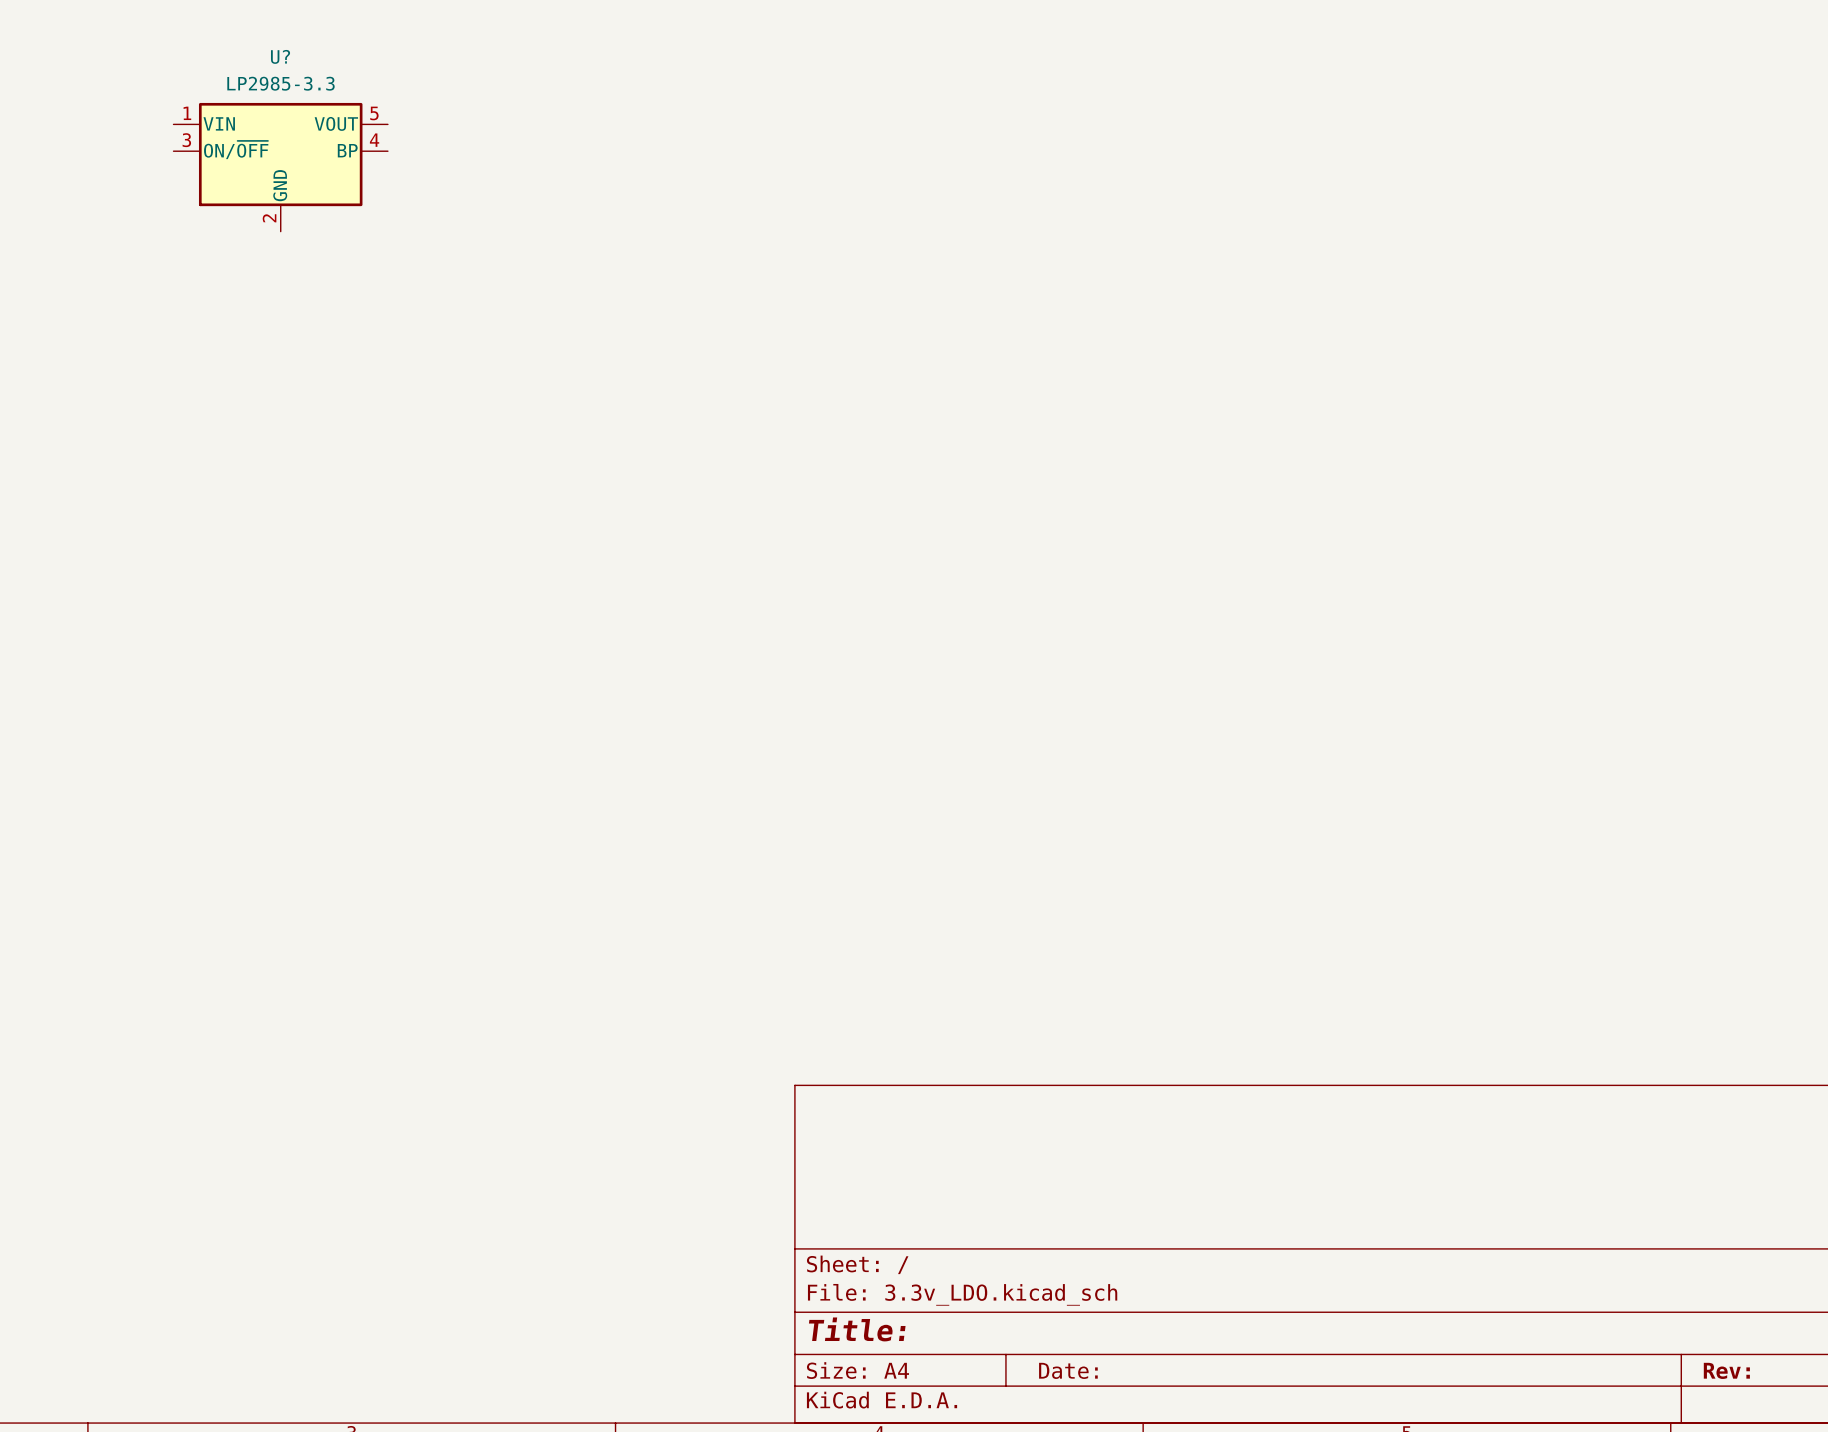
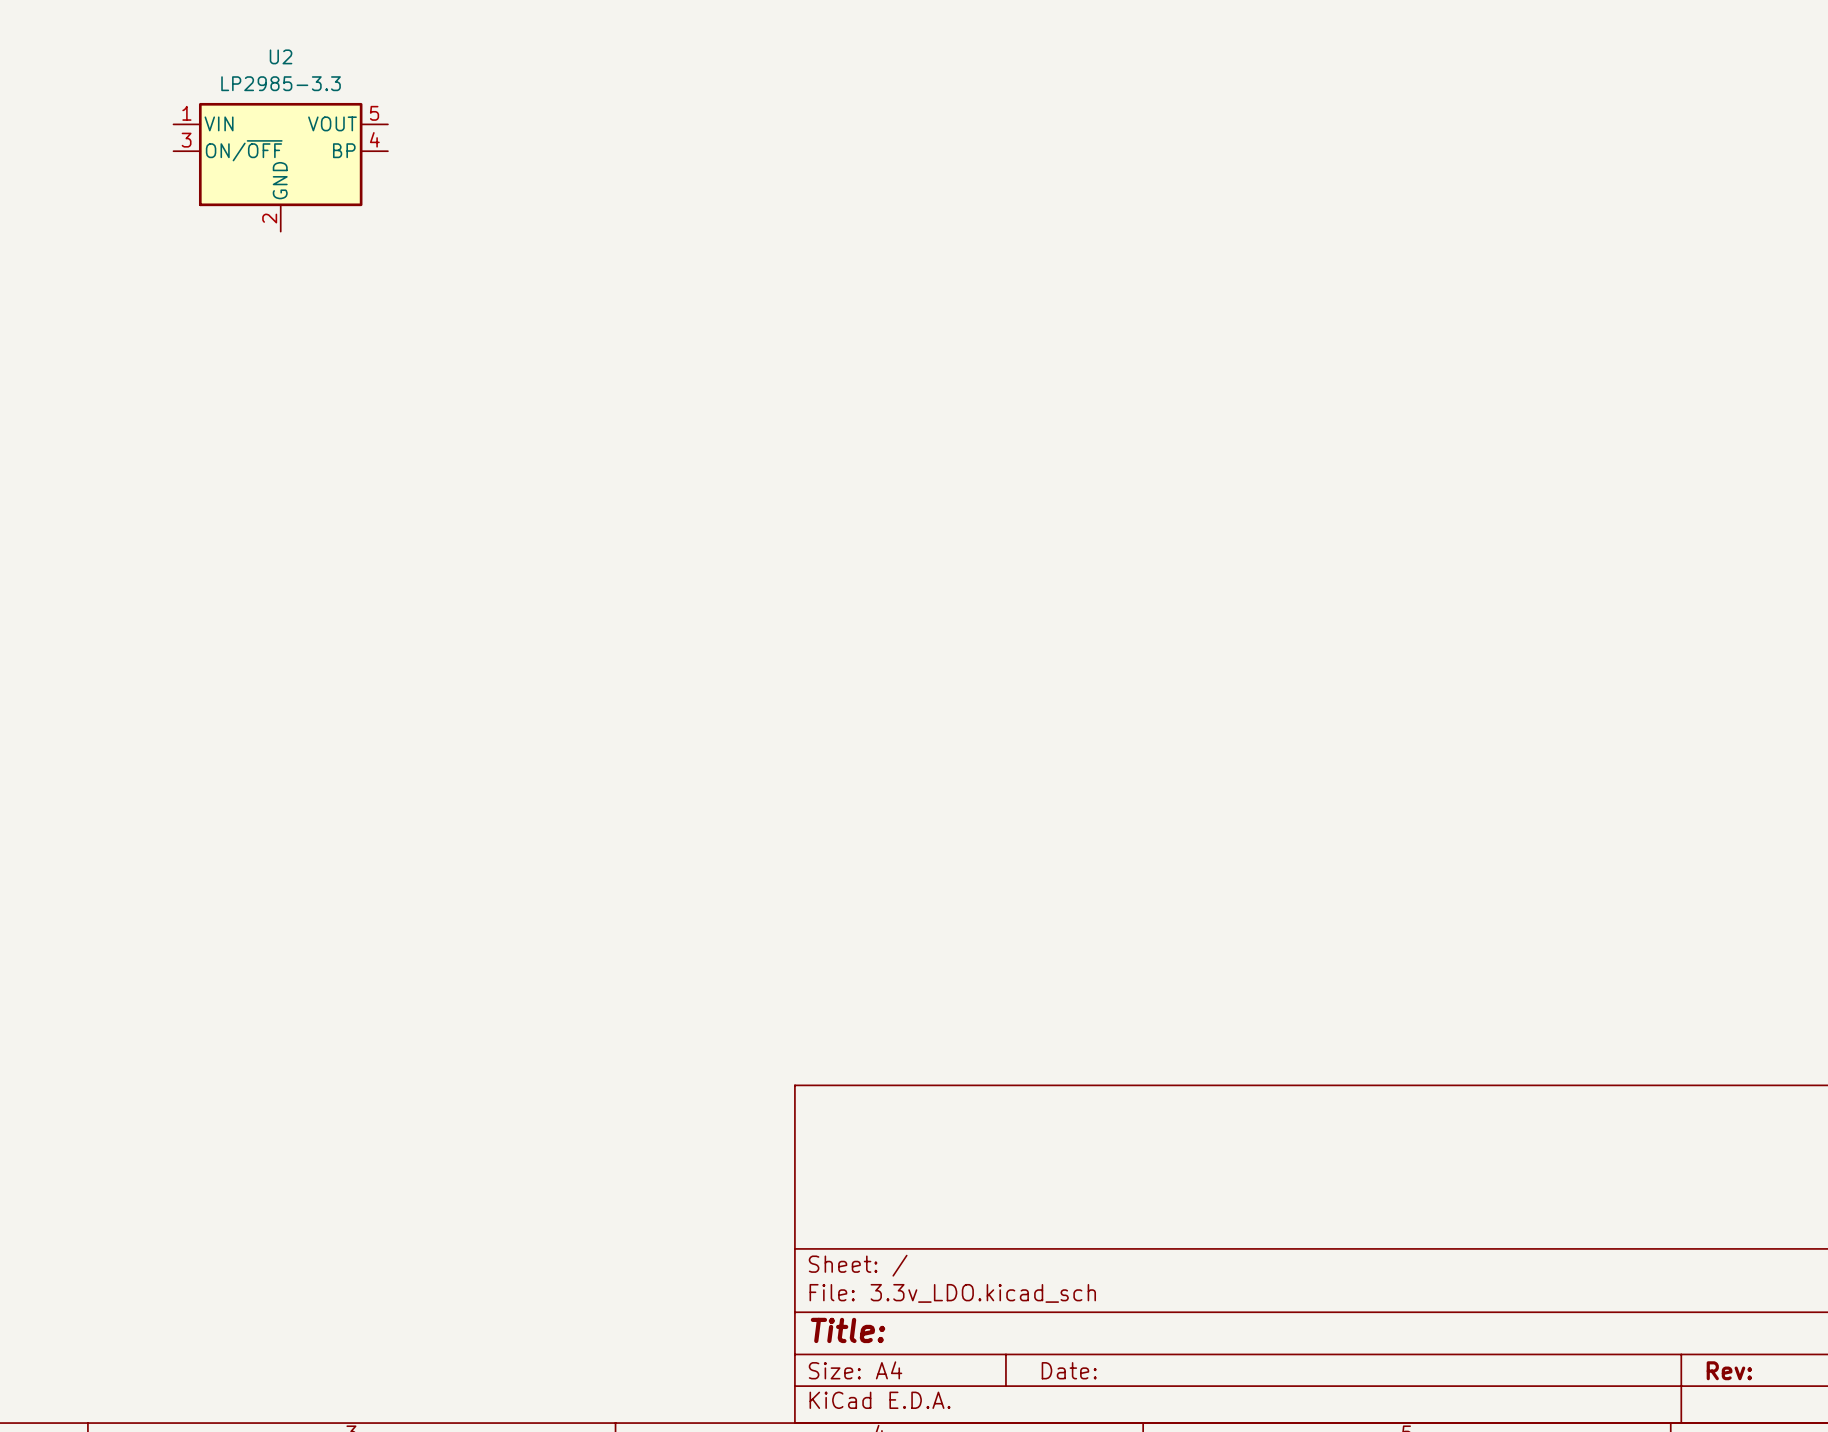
U? name: U? (280, 56) -> U2 (281, 56)

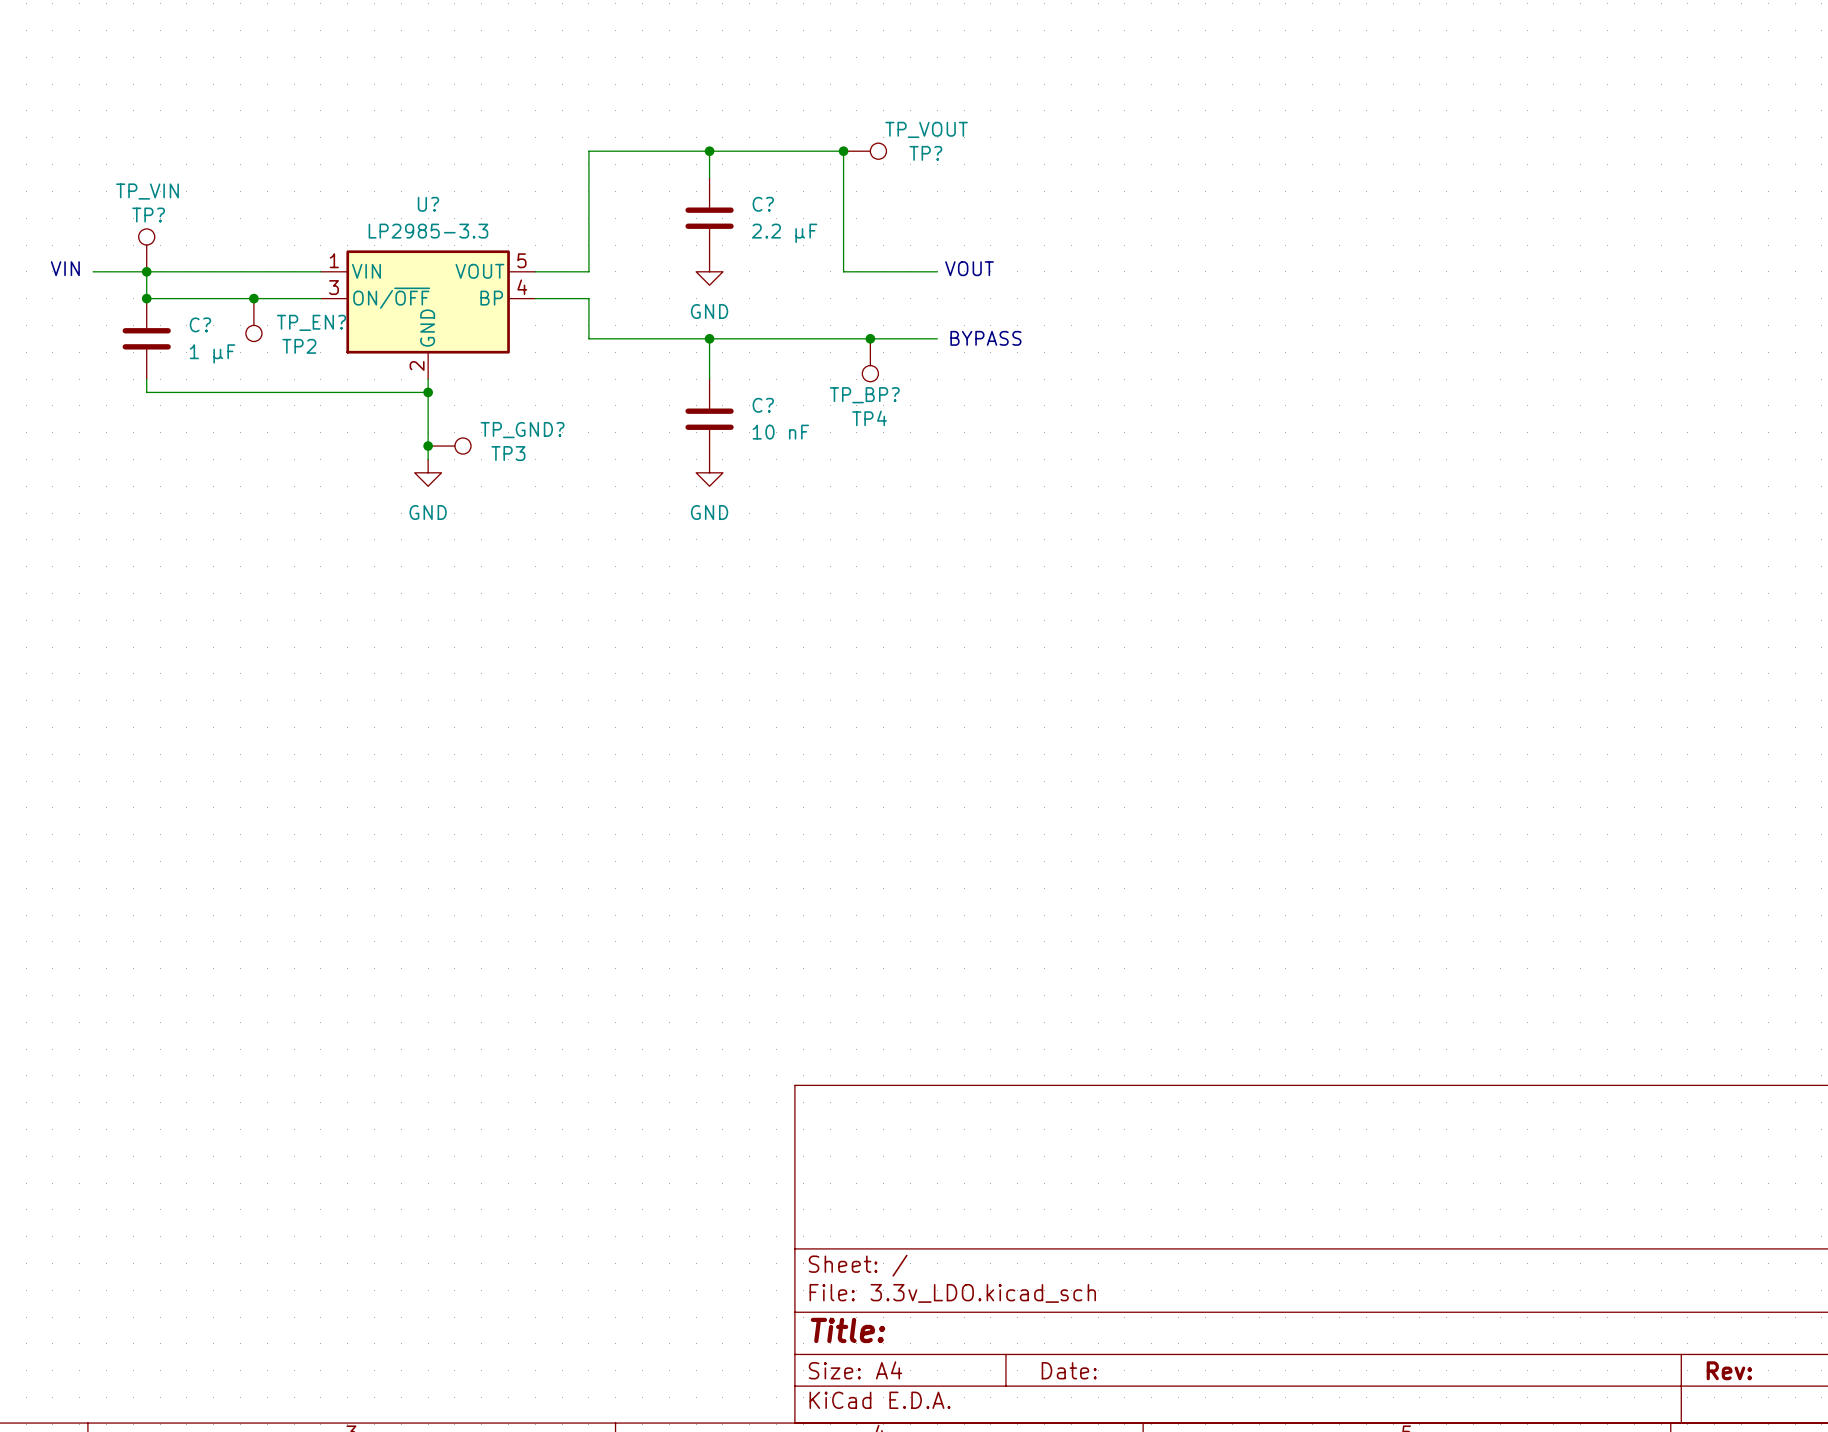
wire: none -> (709, 151) (709, 178)
junction: none -> (709, 151)
junction: none -> (843, 151)
TP?: none -> TP_VOUT (865, 151)
U2: LP2985-3.3 (280, 167) -> none
C?: none -> 2.2 µF (709, 218)
TP?: none -> TP_VIN (146, 250)
text: none -> VIN (65, 268)
text: none -> VOUT (969, 268)
wire: none -> (93, 271) (320, 271)
wire: none -> (146, 271) (146, 298) (320, 298)
junction: none -> (146, 271)
wire: none -> (535, 271) (588, 271) (588, 151) (843, 151) (843, 271) (937, 271)
power symbol: none -> GND (709, 271)
junction: none -> (146, 298)
junction: none -> (253, 298)
wire: none -> (535, 298) (588, 298) (588, 338) (937, 338)
U?: none -> LP2985-3.3 (428, 314)
TP_EN?: none -> TP2 (253, 320)
C?: none -> 1 µF (146, 338)
wire: none -> (709, 338) (709, 379)
junction: none -> (709, 338)
junction: none -> (870, 338)
text: none -> BYPASS (985, 338)
TP_BP?: none -> TP4 (870, 360)
wire: none -> (146, 379) (146, 392) (428, 392)
wire: none -> (428, 379) (428, 459)
junction: none -> (428, 392)
C?: none -> 10 nF (709, 419)
junction: none -> (428, 446)
TP_GND?: none -> TP3 (449, 446)
power symbol: none -> GND (428, 472)
power symbol: none -> GND (709, 472)

